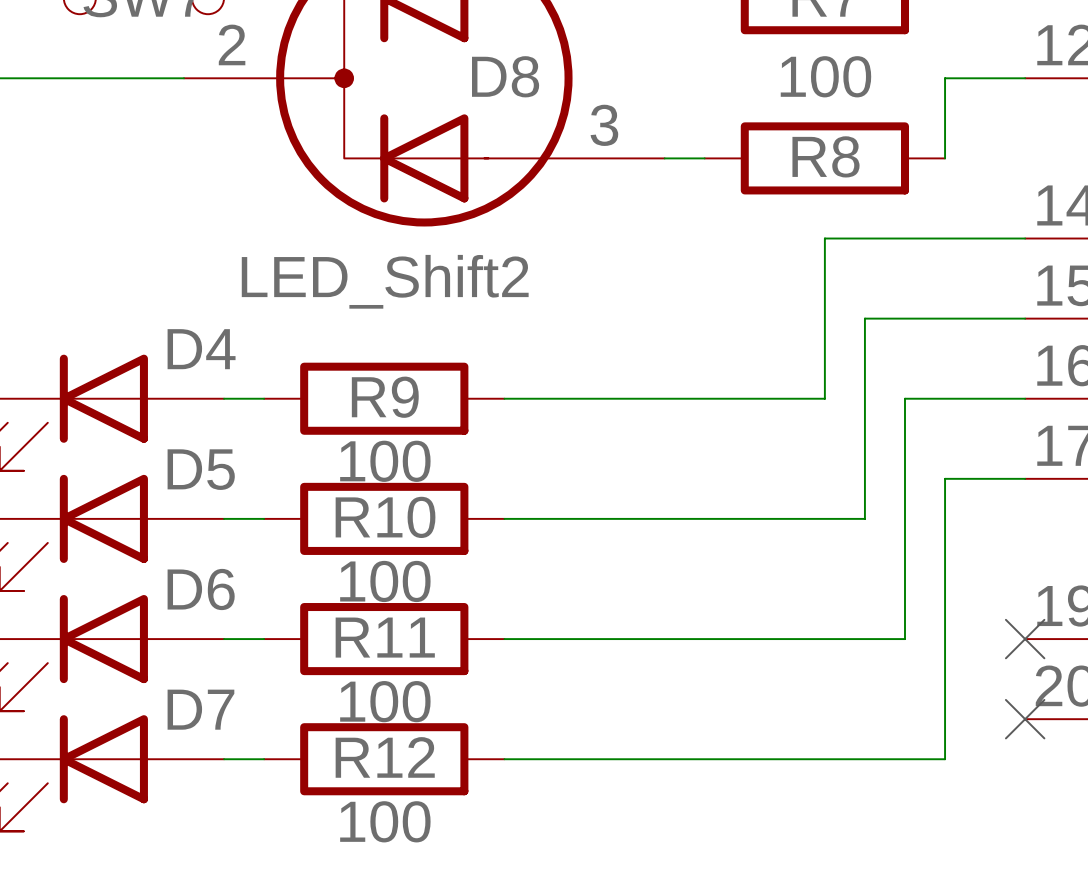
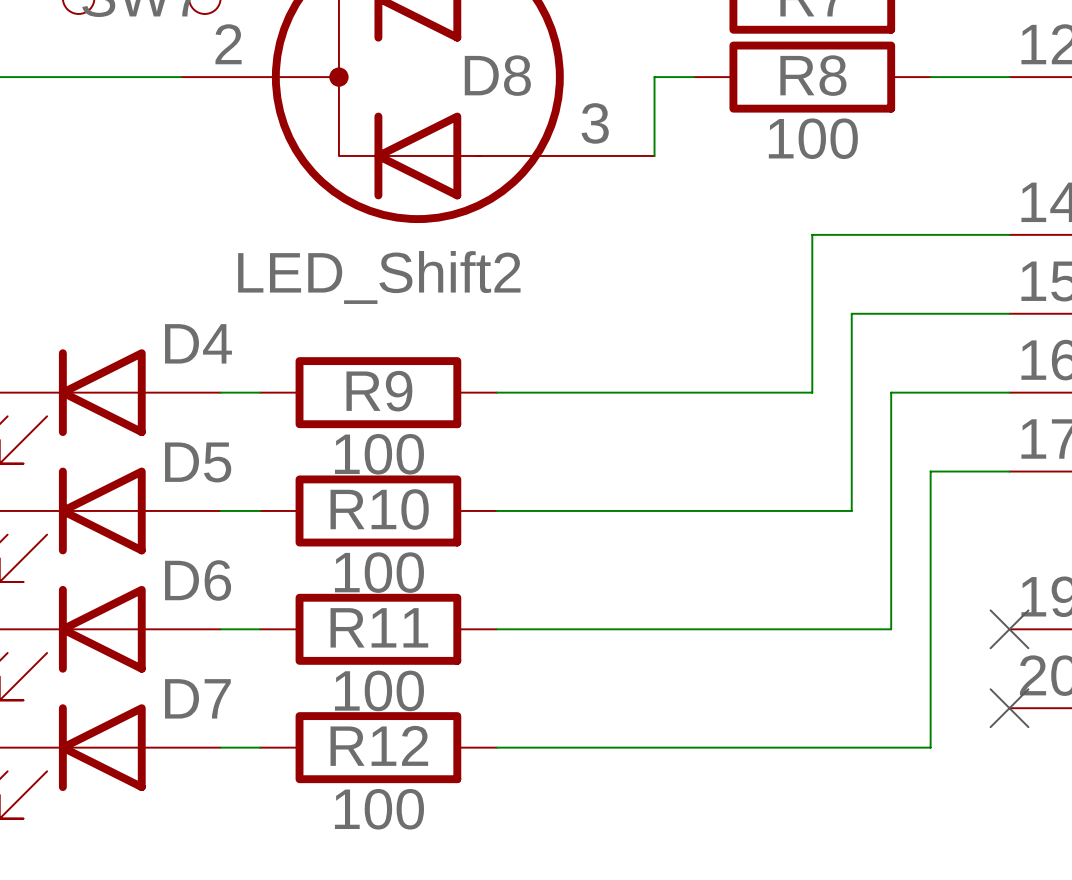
R8 value position: 100 (825, 76) -> 100 (813, 138)
wire: (945, 78) (945, 158) -> none
wire: (664, 158) (704, 158) -> (654, 155) (654, 77) (693, 77)
R8 position: (824, 158) -> (812, 77)

